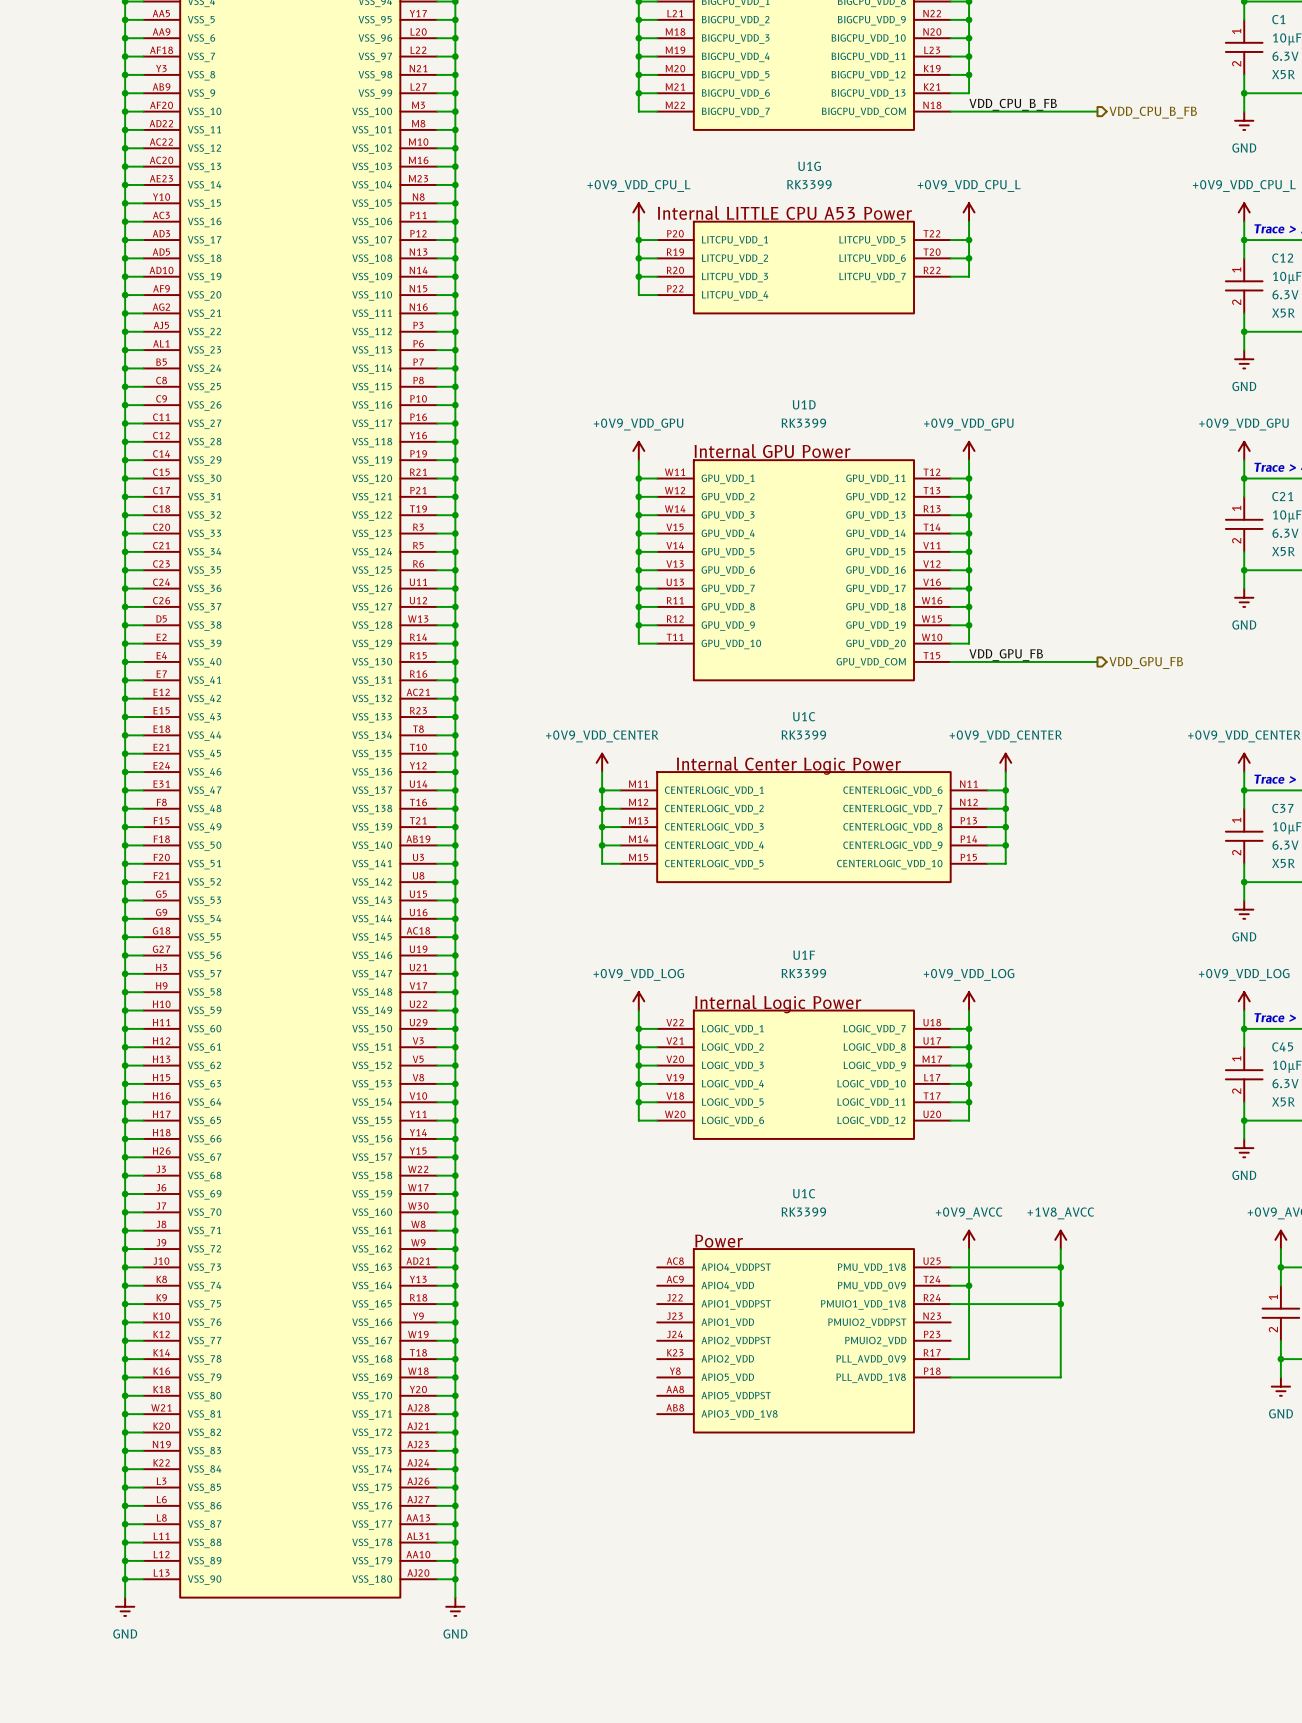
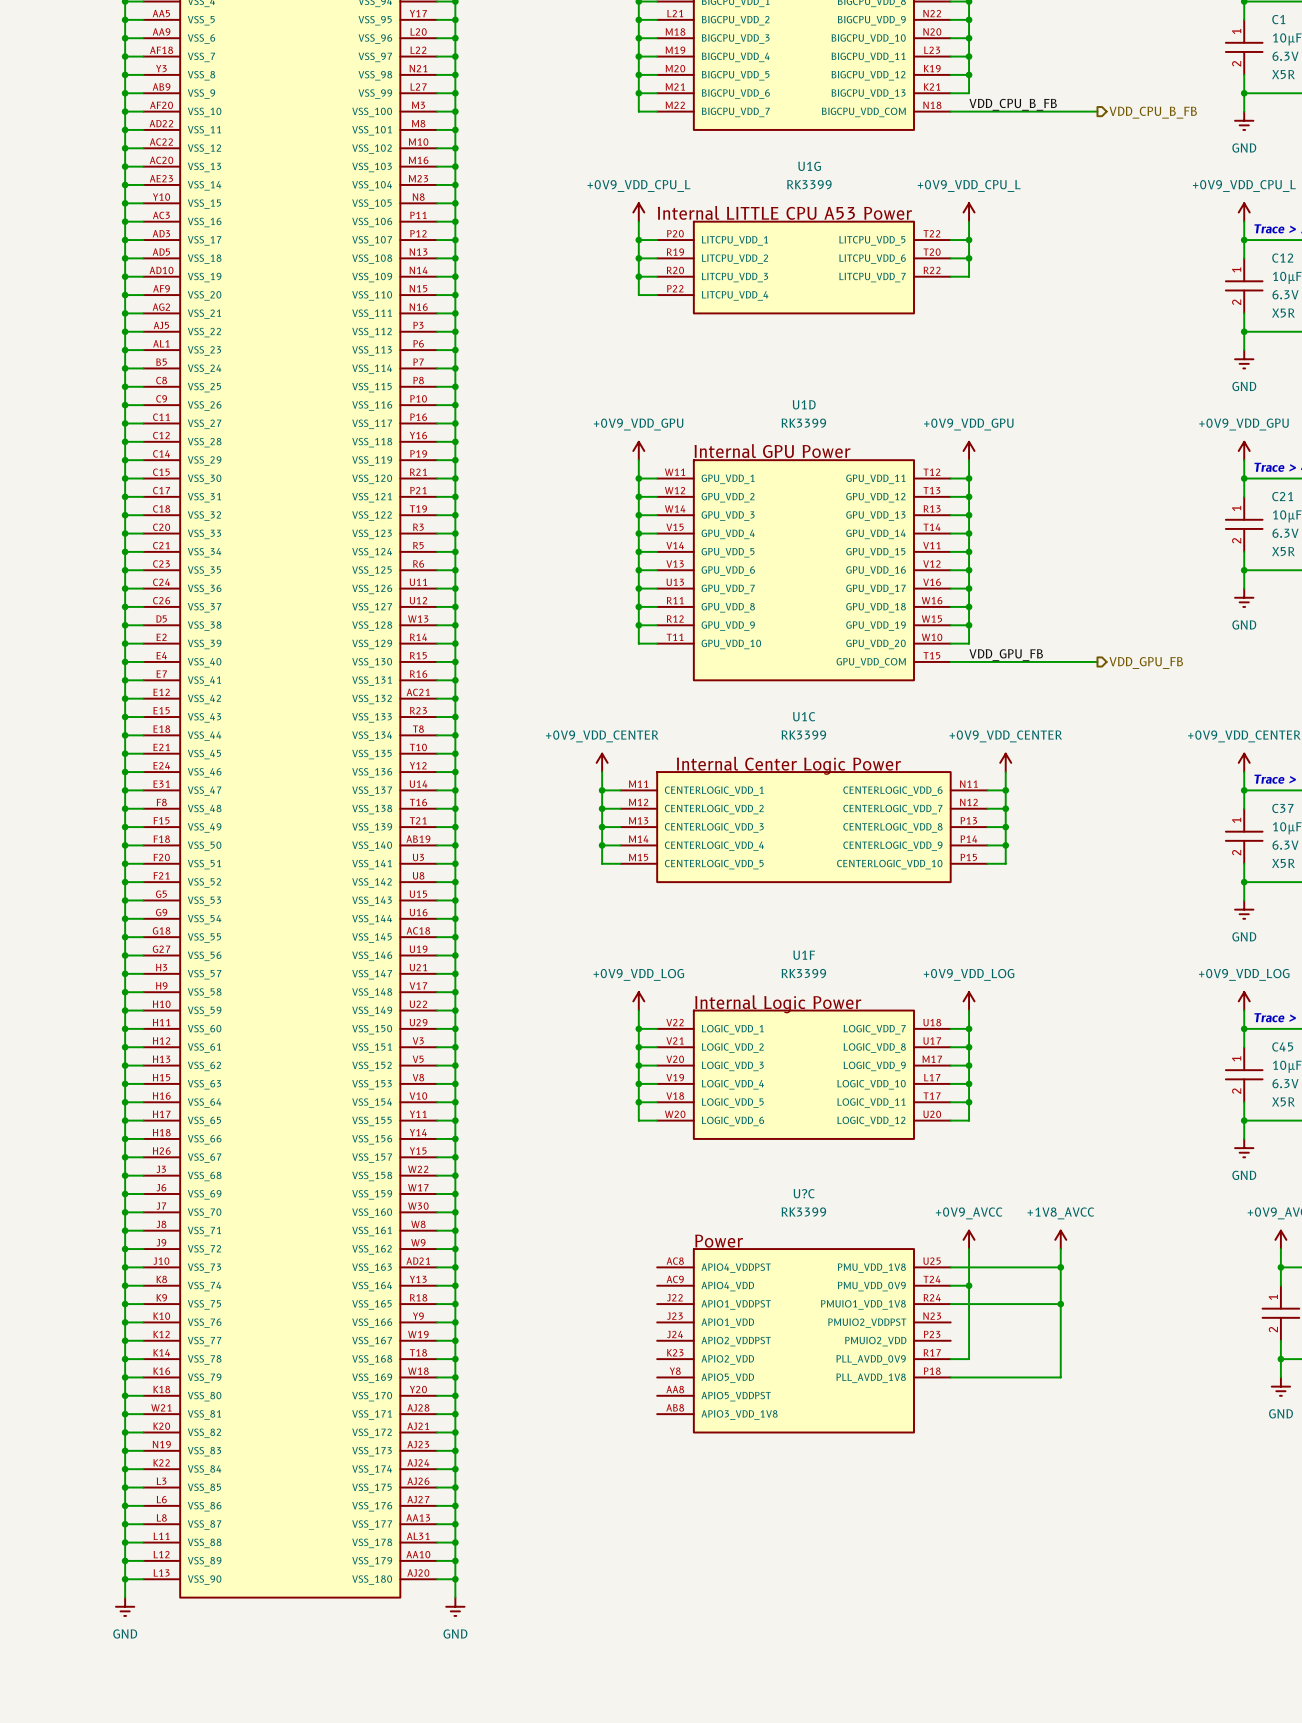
U1C name: U1C (804, 1193) -> U?C (804, 1193)

